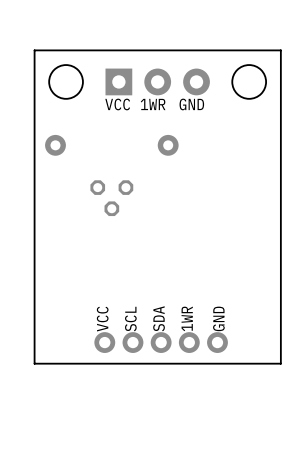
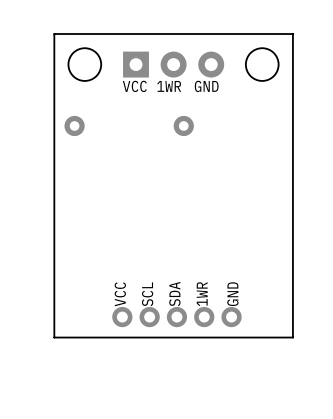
part: (111, 198) -> none

